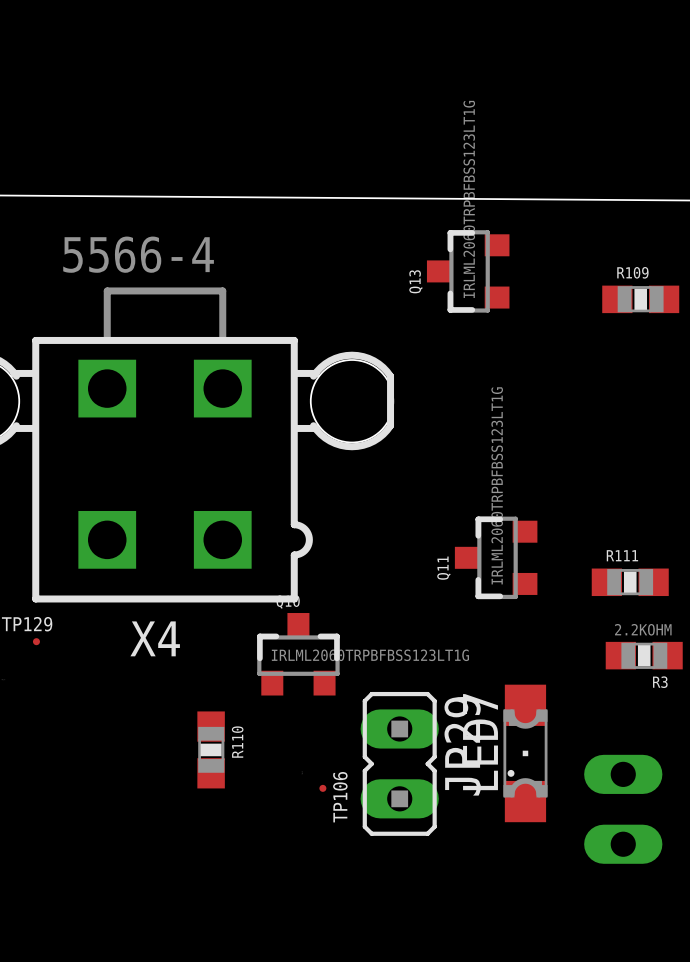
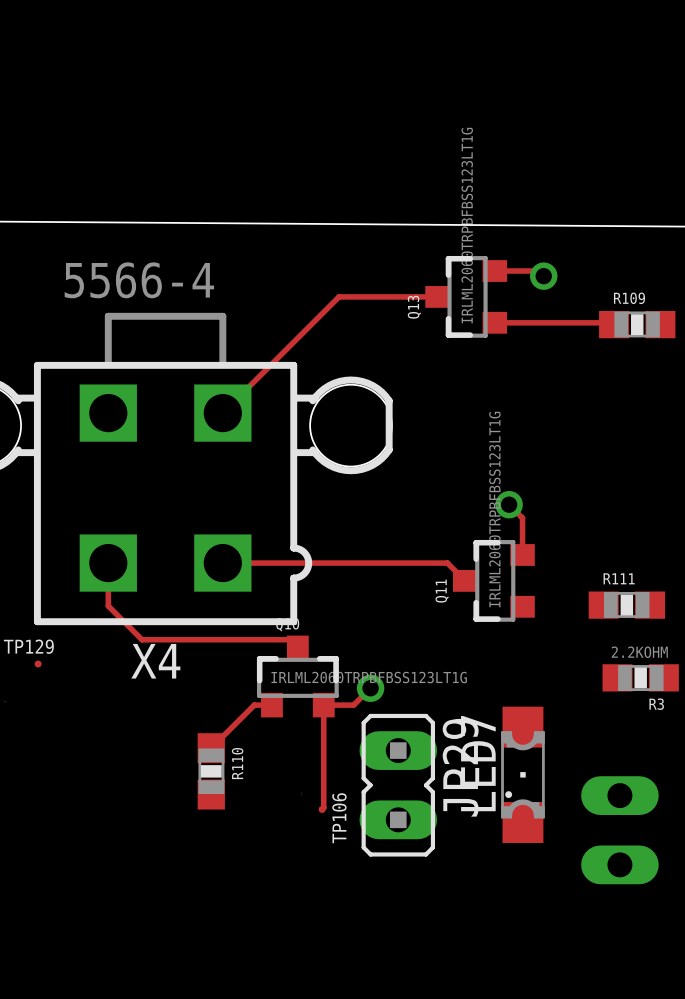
track: none -> (494, 271) (538, 271) (543, 276)
via: none -> (543, 276)
track: none -> (437, 296) (339, 296) (222, 413)
track: none -> (494, 322) (612, 322) (614, 324)
track: none -> (509, 504) (522, 518) (522, 554)
via: none -> (509, 504)
track: none -> (108, 563) (108, 606) (142, 639) (289, 639) (297, 647)
track: none -> (222, 563) (447, 563) (465, 580)
track: none -> (370, 688) (353, 705) (323, 705) (323, 807) (322, 809)
via: none -> (370, 688)
track: none -> (271, 705) (254, 705) (211, 748)

